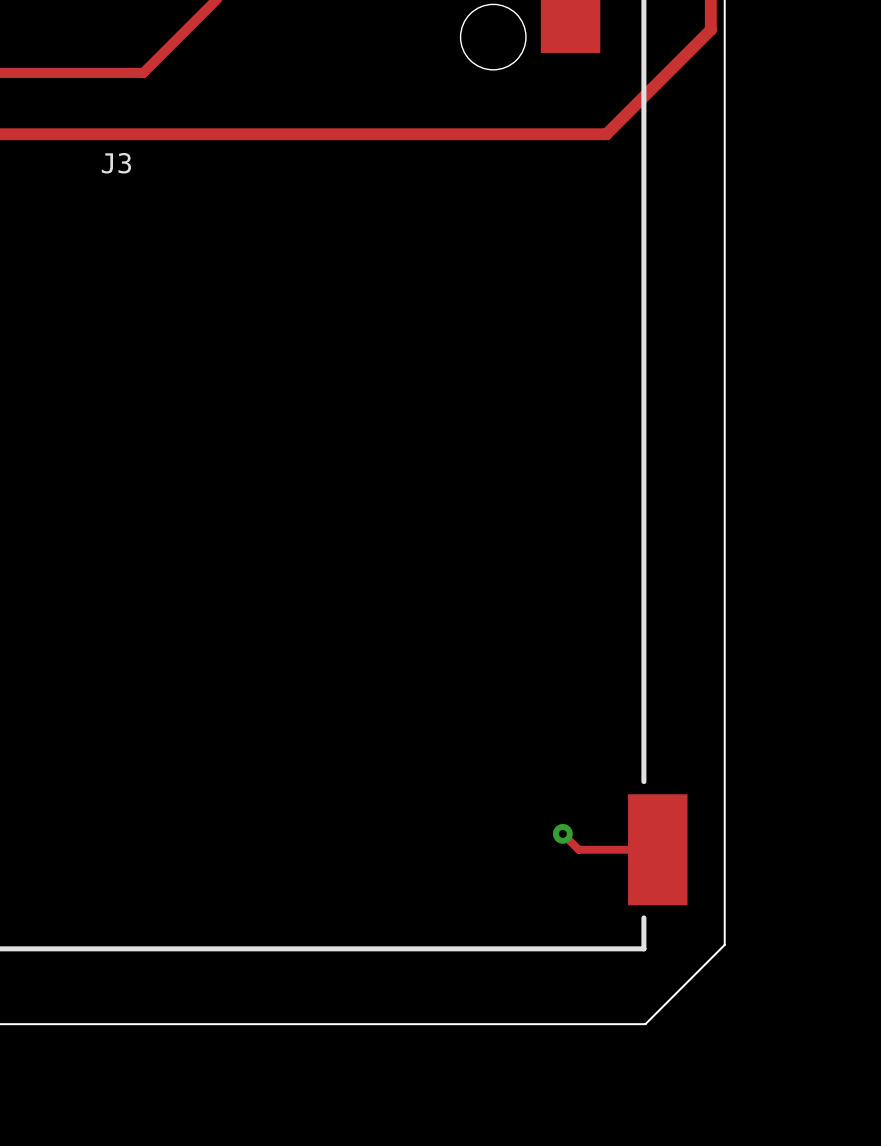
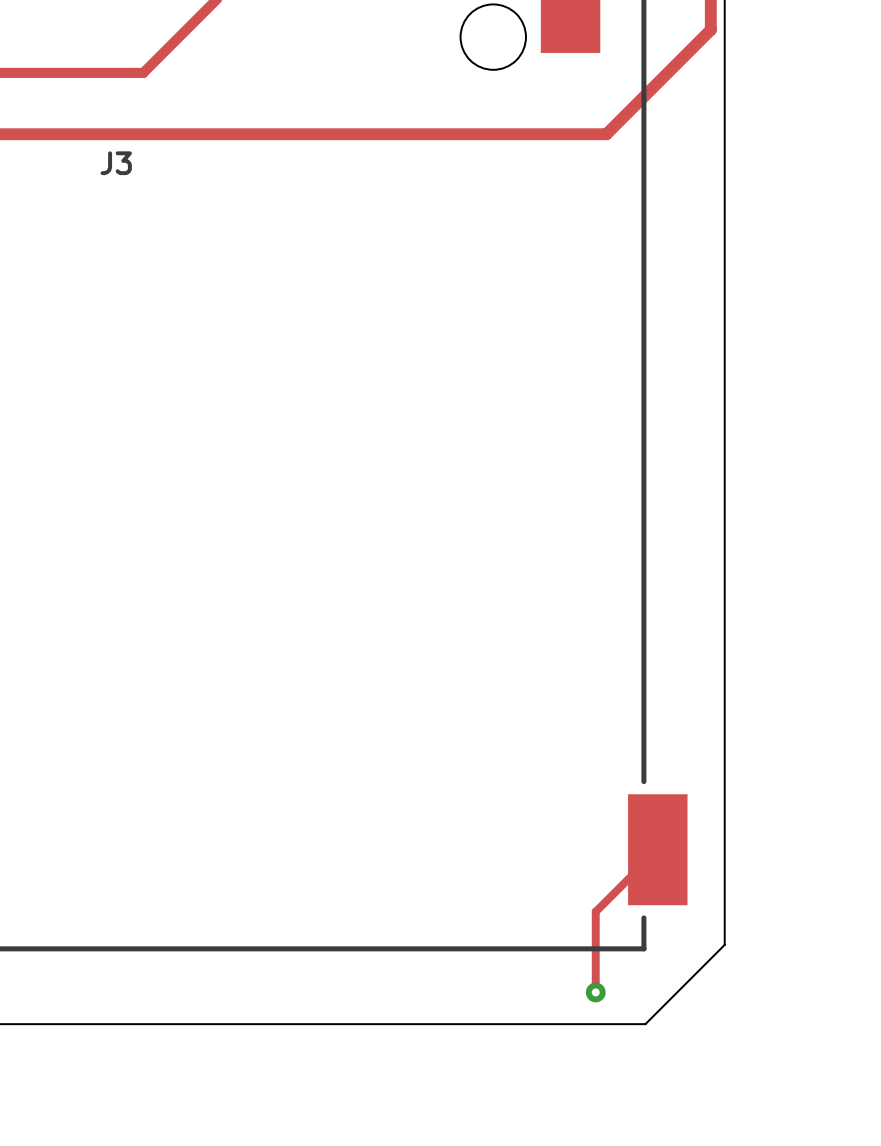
top track: (562, 833) (578, 849) (657, 849) -> (595, 992) (595, 911) (657, 849)
via position: (562, 833) -> (595, 992)

